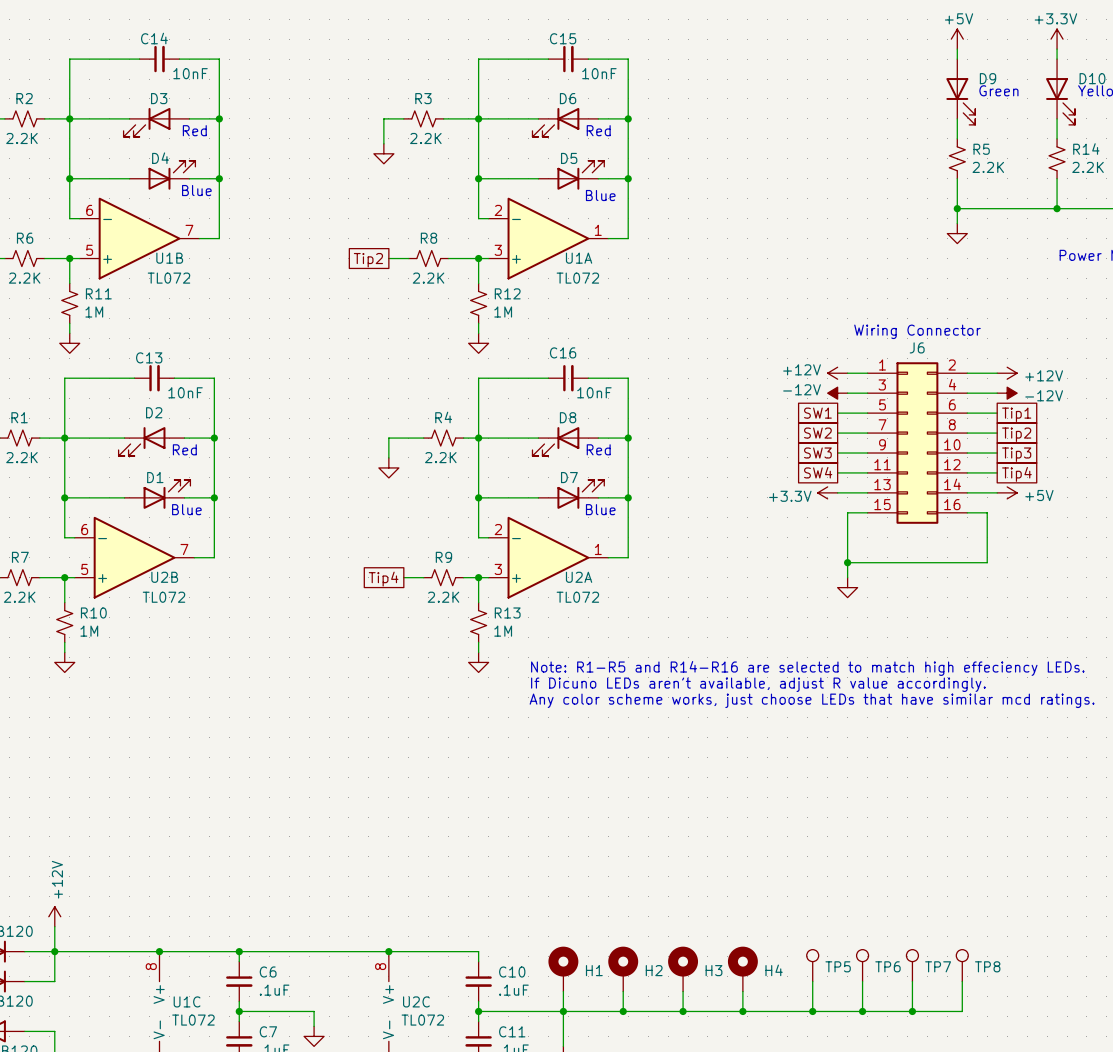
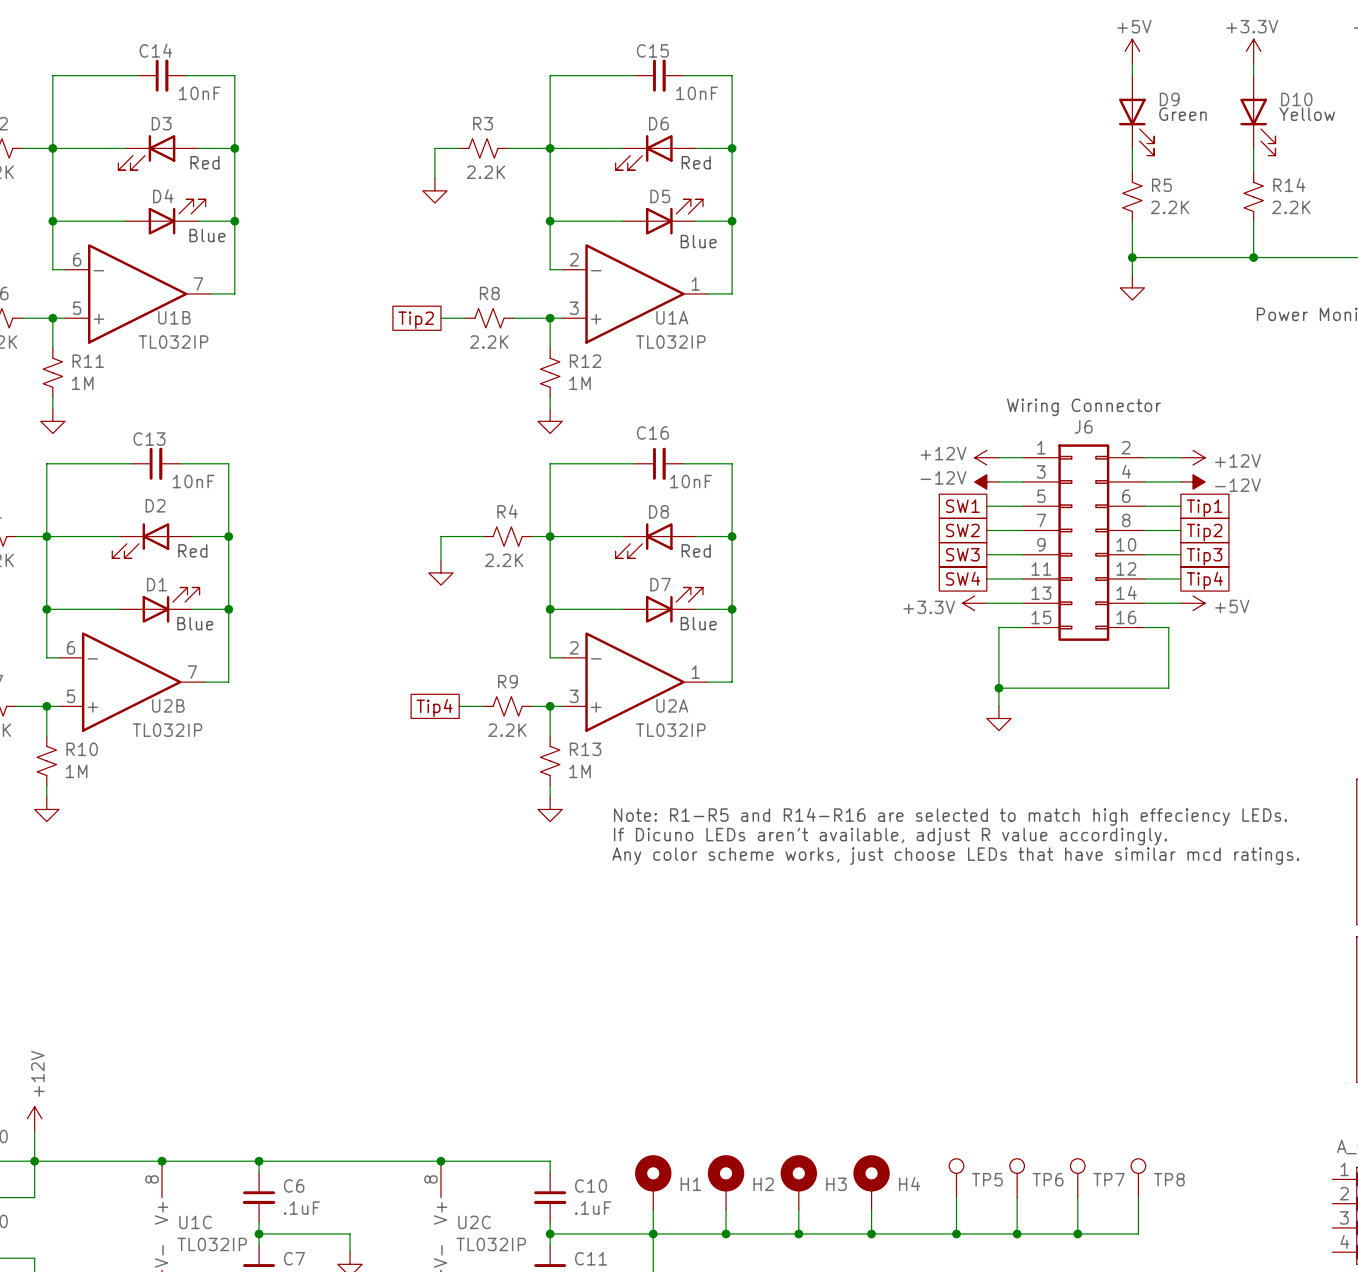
U1B value: TL072 (168, 278) -> TL032IP (173, 342)
U1A value: TL072 (577, 278) -> TL032IP (670, 342)
U2B value: TL072 (164, 597) -> TL032IP (167, 730)
U2A value: TL072 (577, 597) -> TL032IP (670, 730)
U1C value: TL072 (193, 1020) -> TL032IP (212, 1244)
U2C value: TL072 (422, 1020) -> TL032IP (491, 1244)

